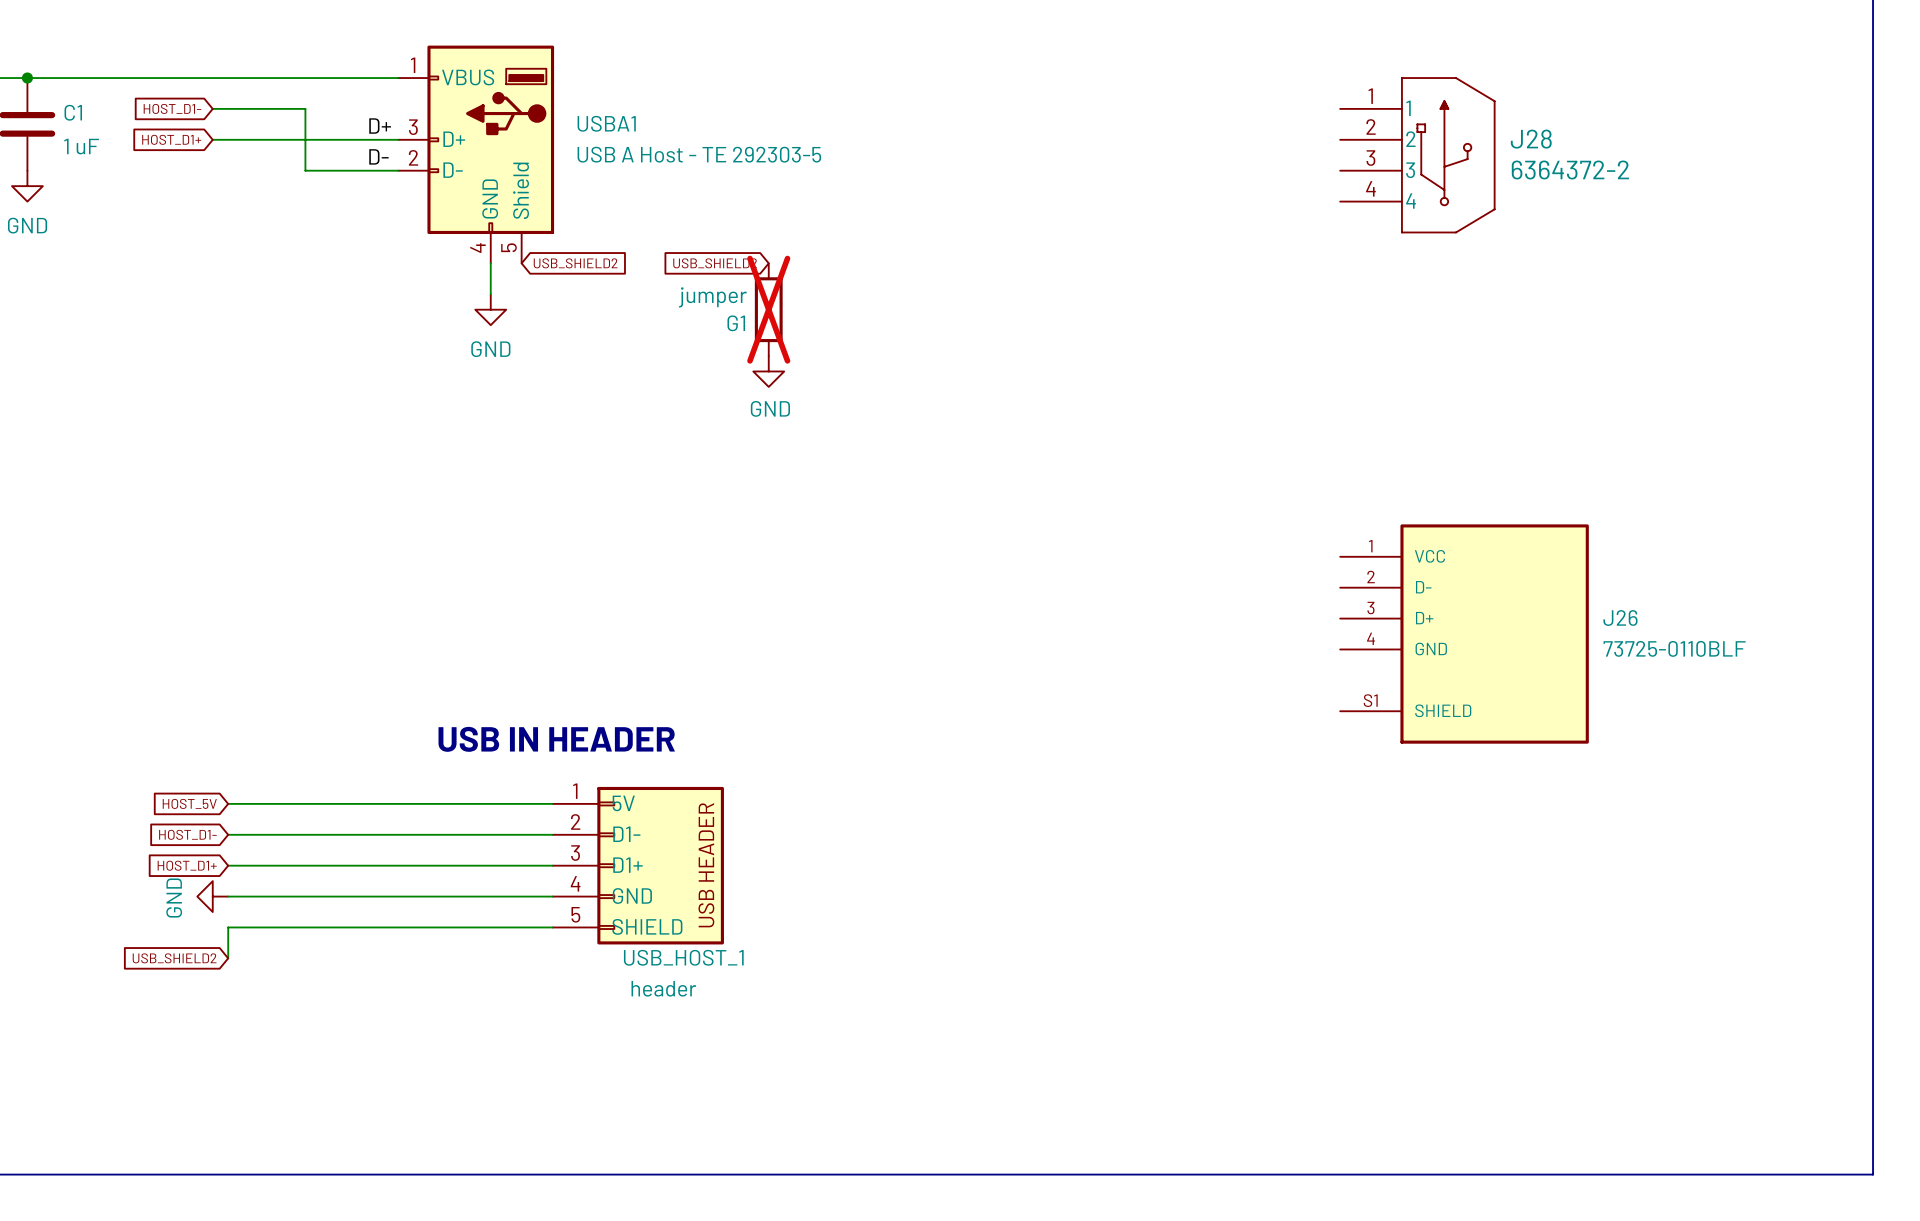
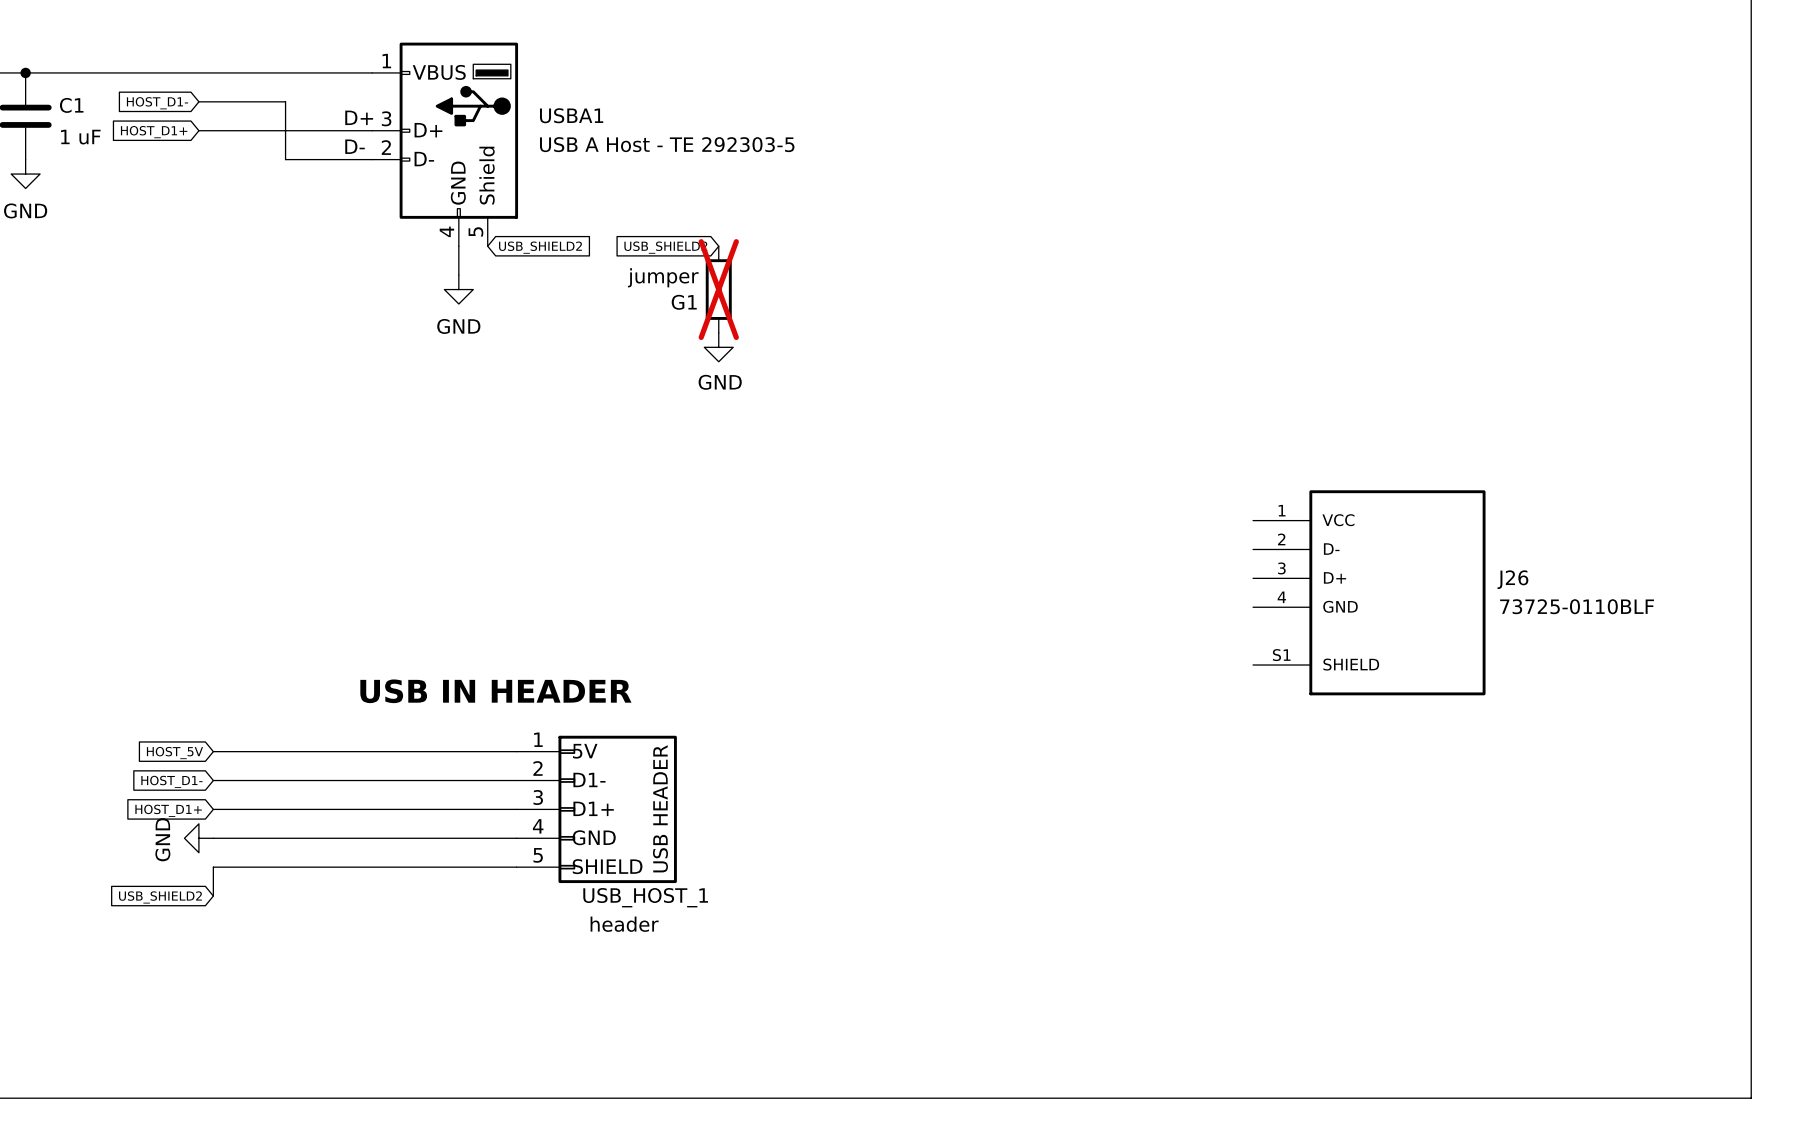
J28: 6364372-2 (1417, 155) -> none

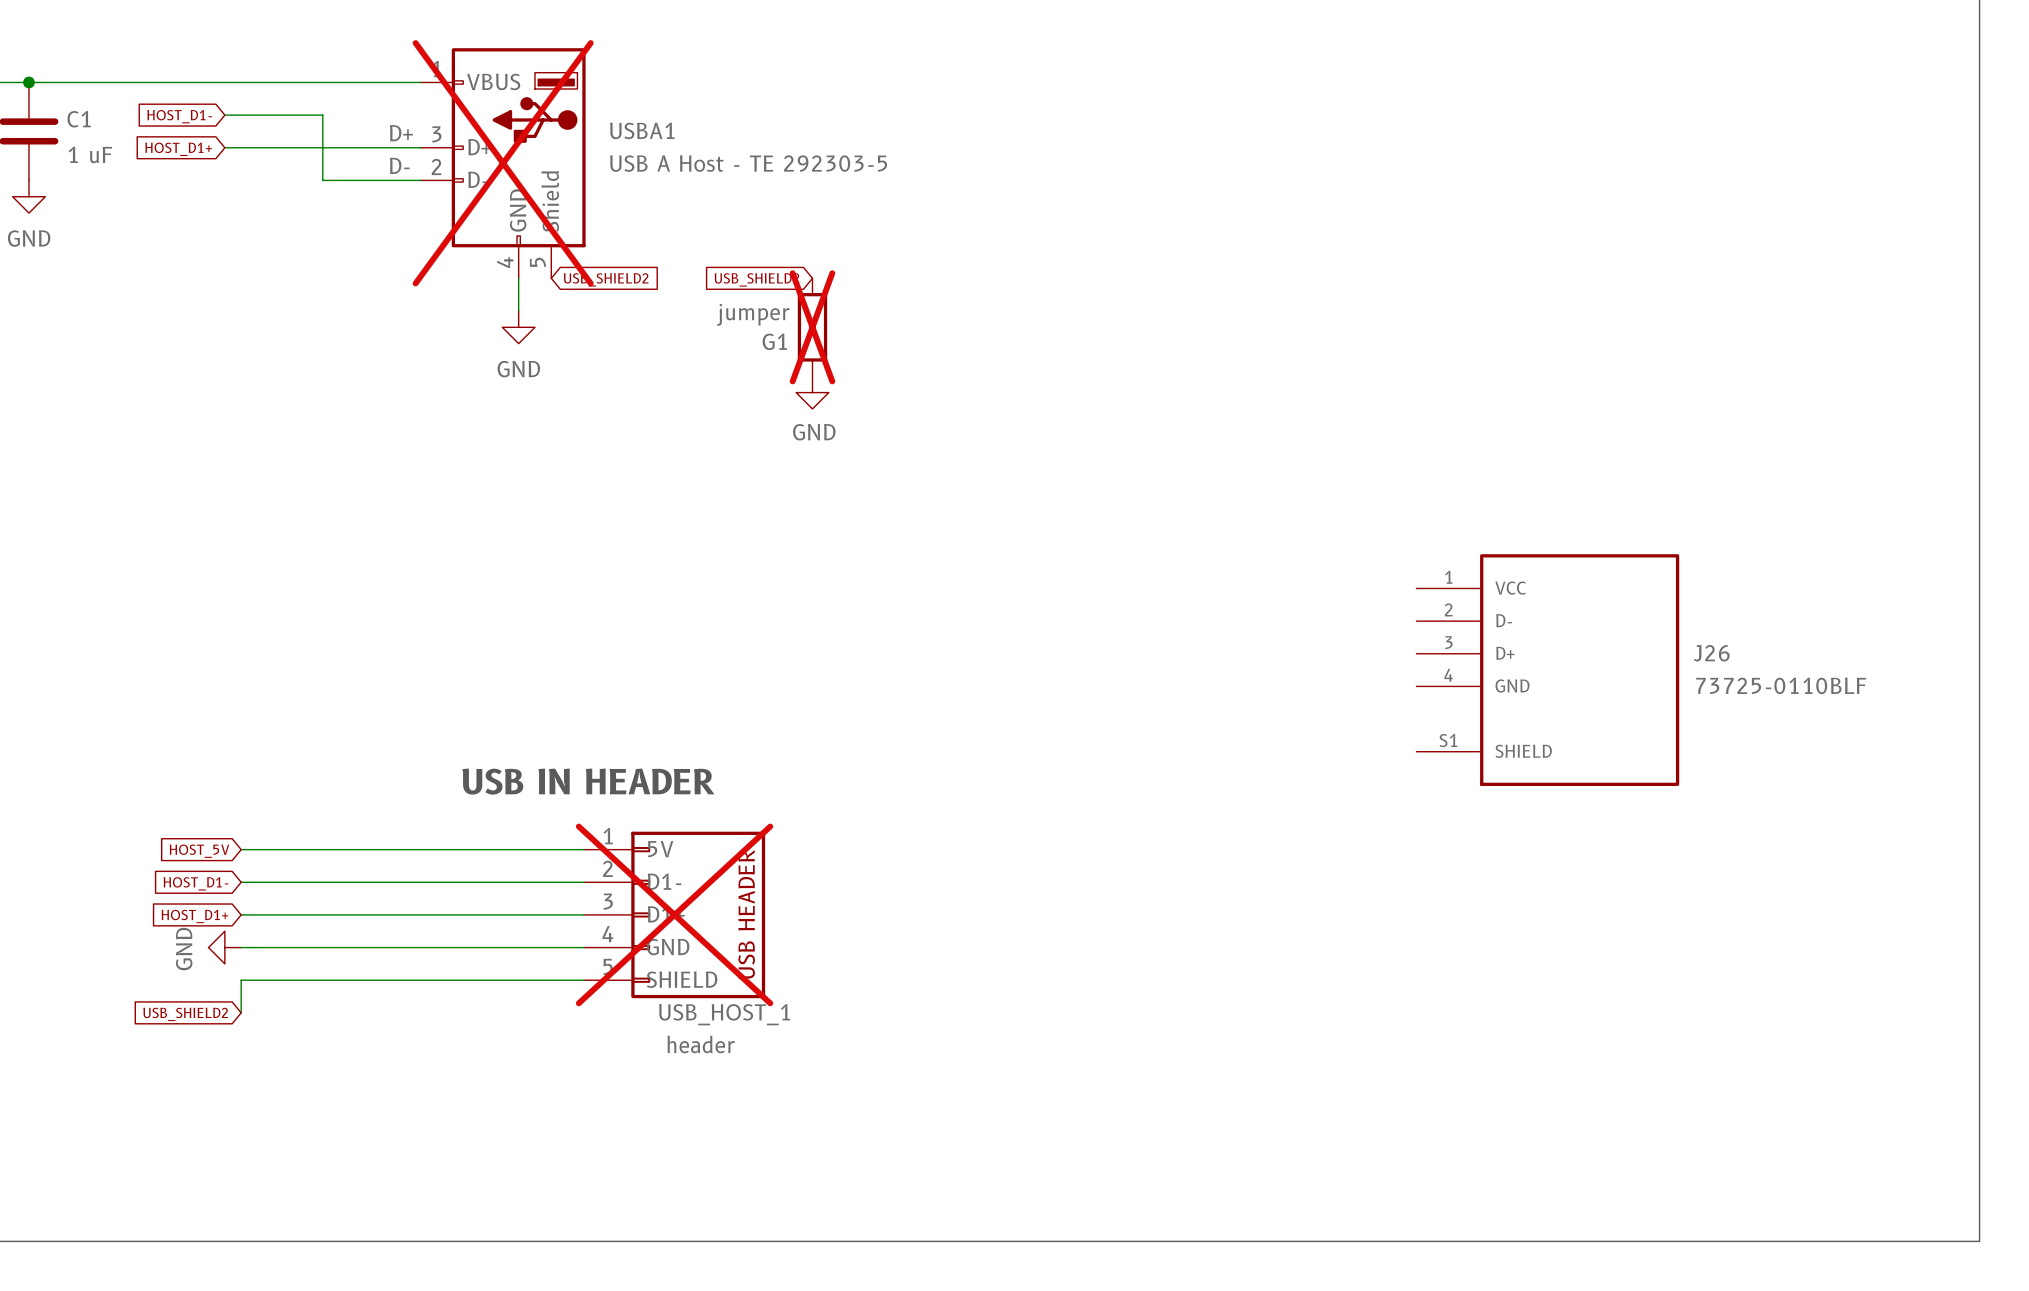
USBA1 do-not-place cross: none -> (503, 163)
USB_HOST_1 do-not-place cross: none -> (674, 914)

